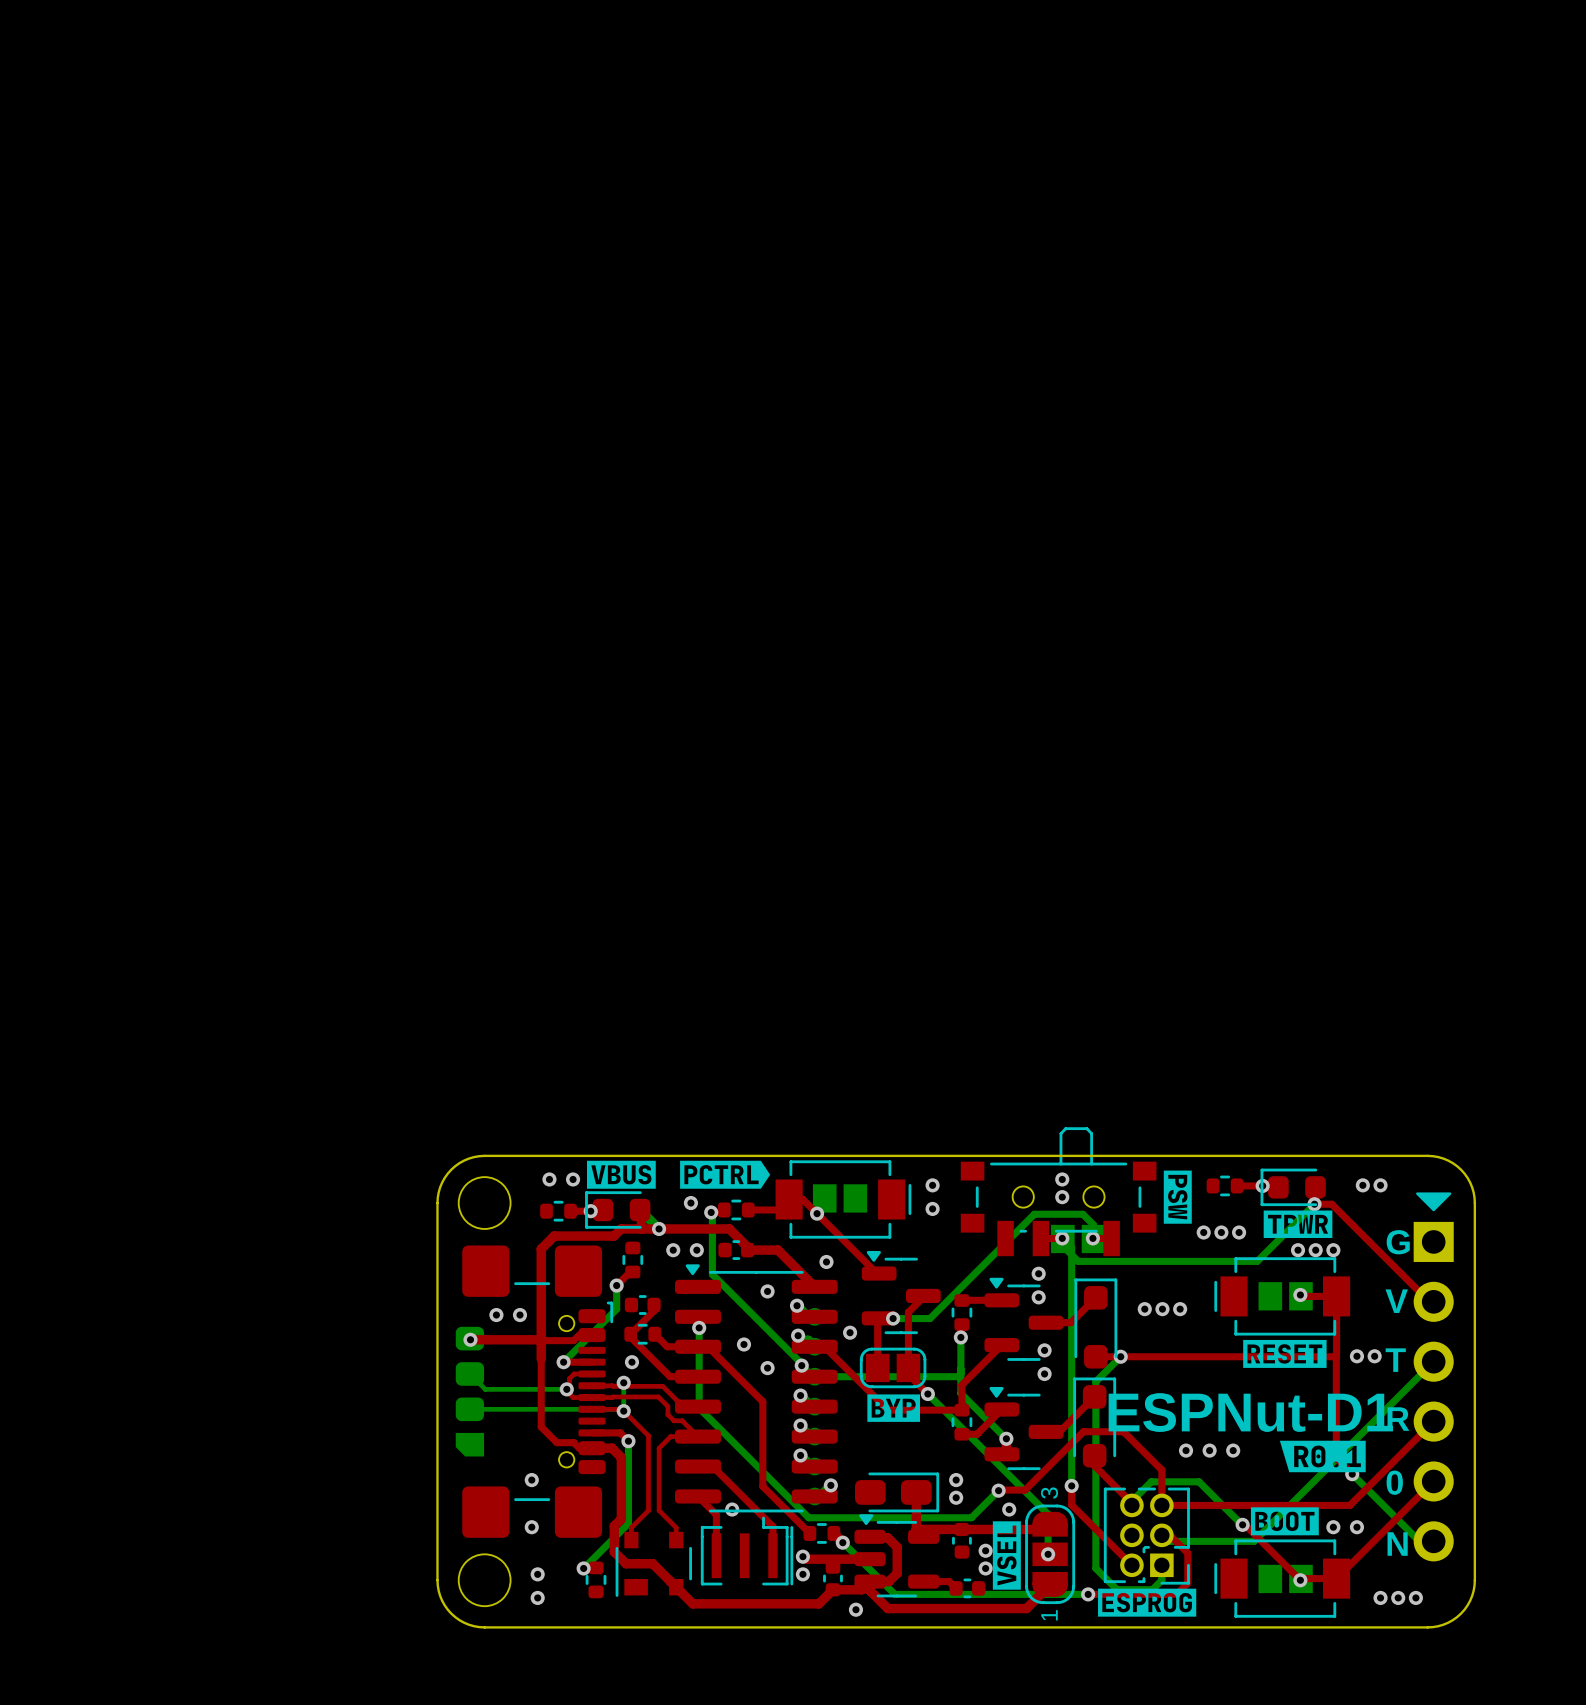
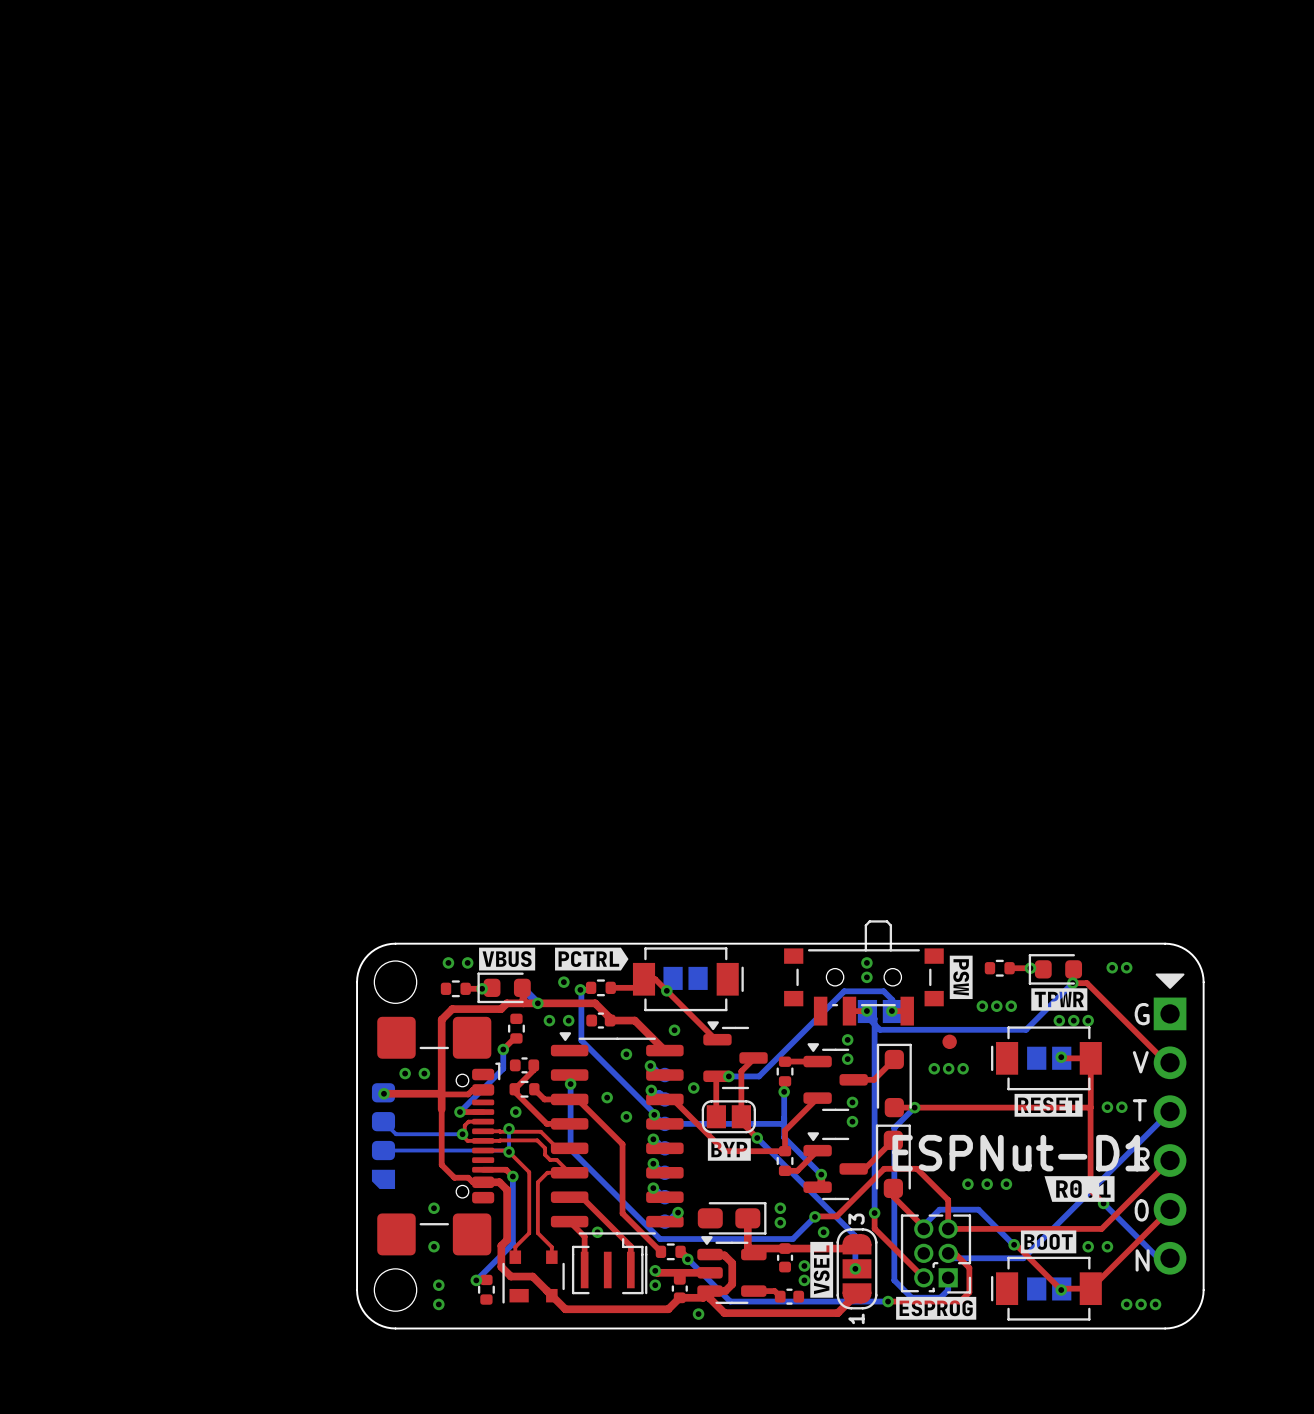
via: (932, 1185) -> none
via: (932, 1208) -> none
part: none -> (949, 1041)

